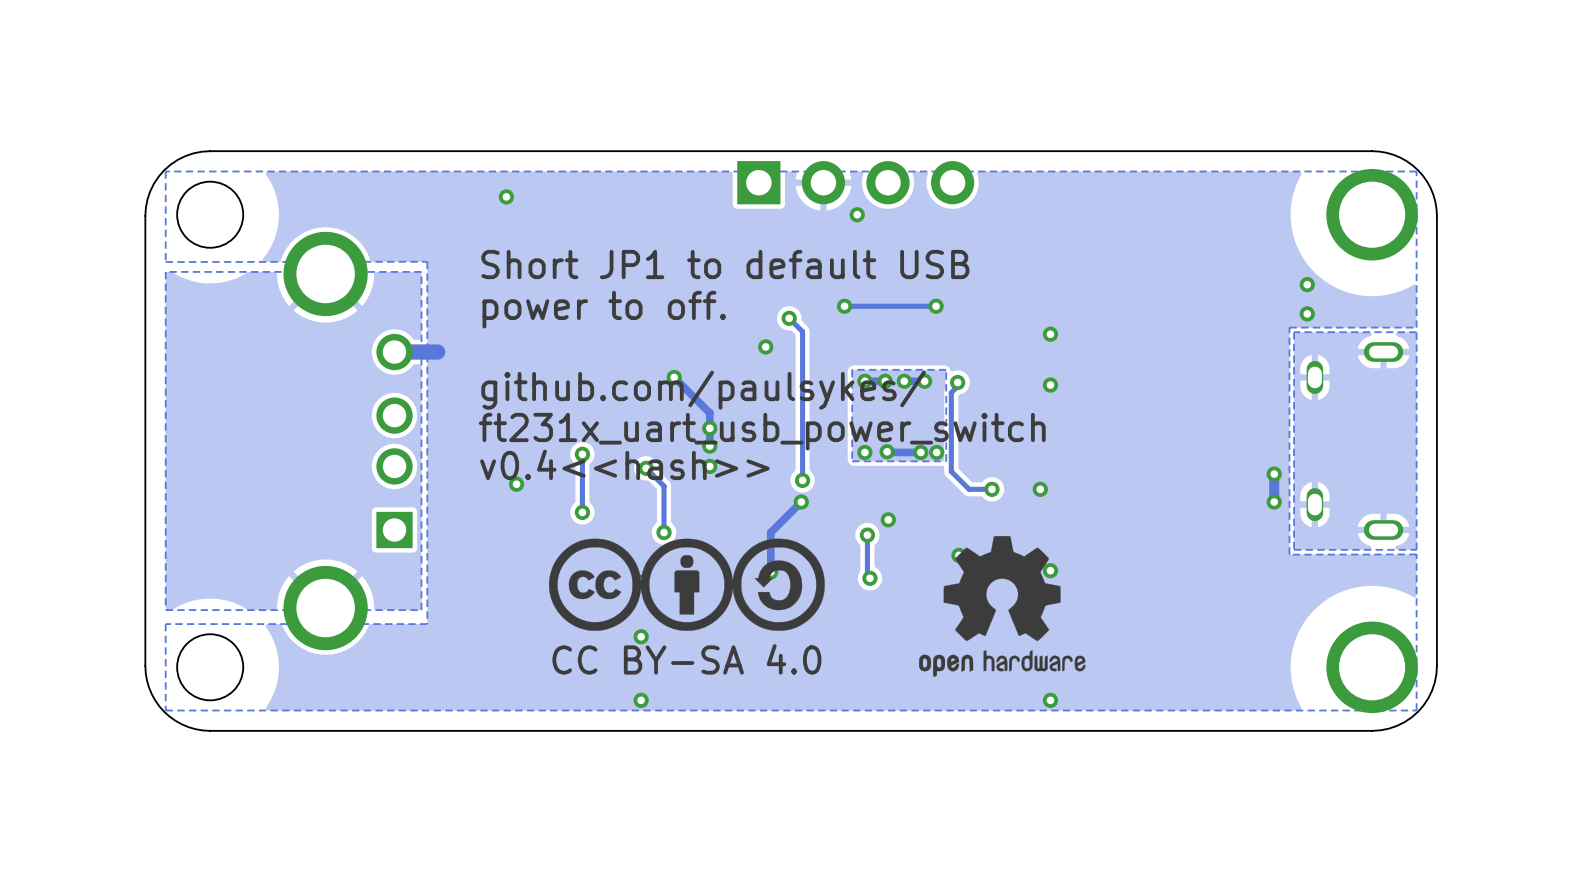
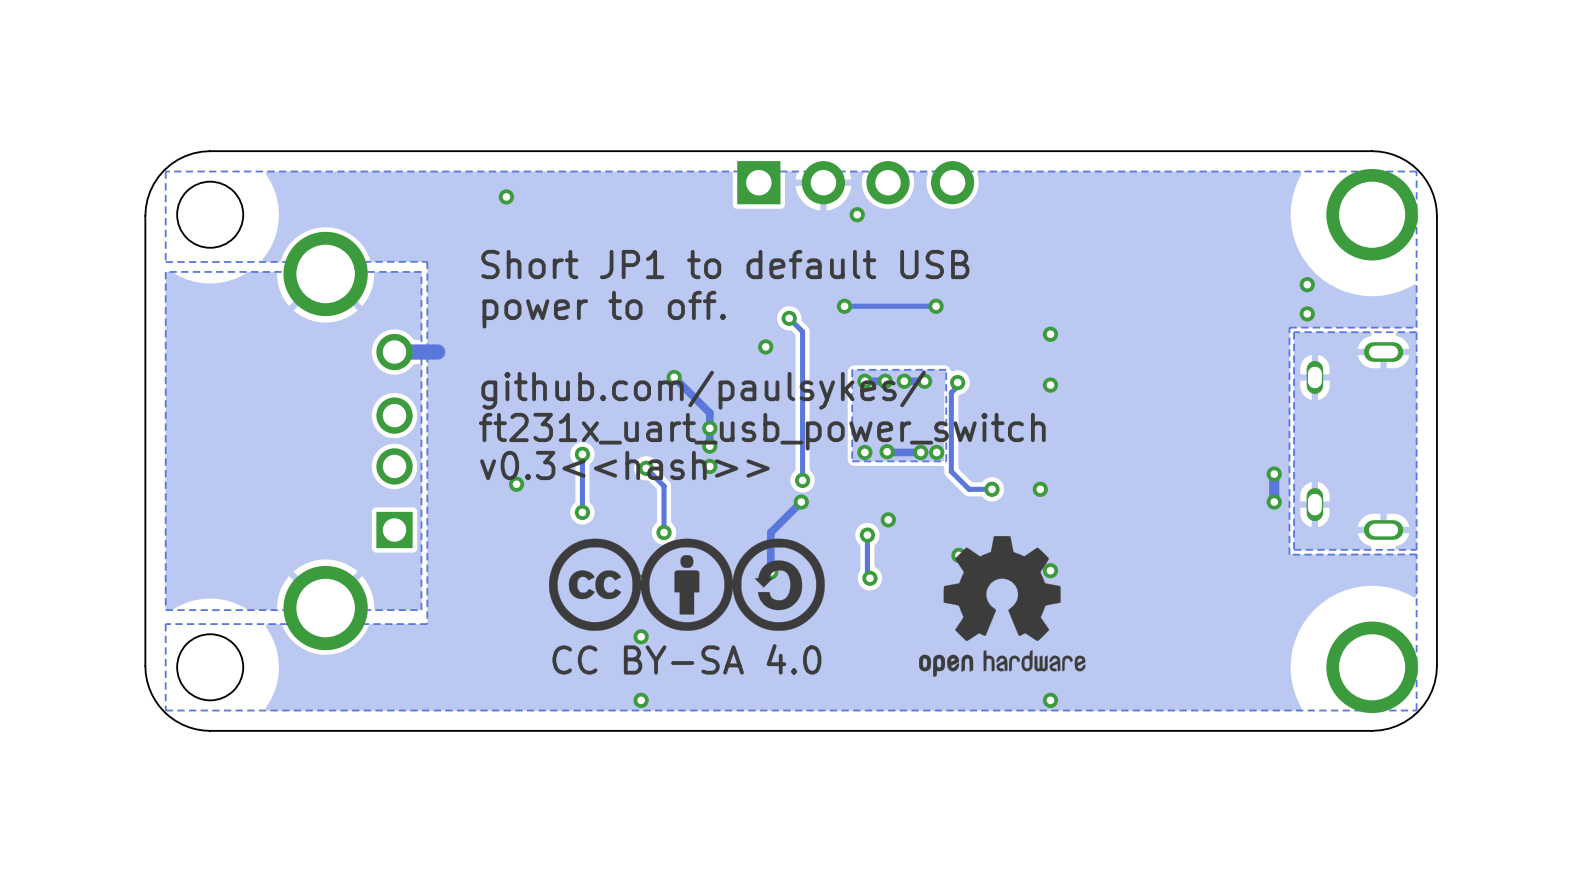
text: v0.4<<hash>> (624, 464) -> v0.3<<hash>> (624, 465)

